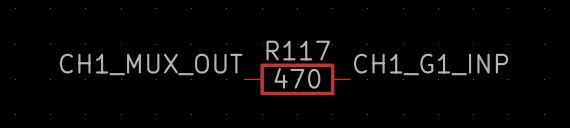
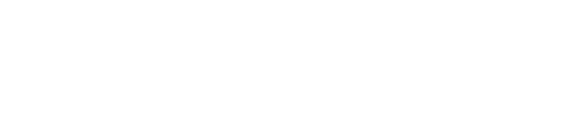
label: CH1_MUX_OUT (151, 64) -> none
label: CH1_G1_INP (431, 64) -> none
R117: 470 (297, 79) -> none

